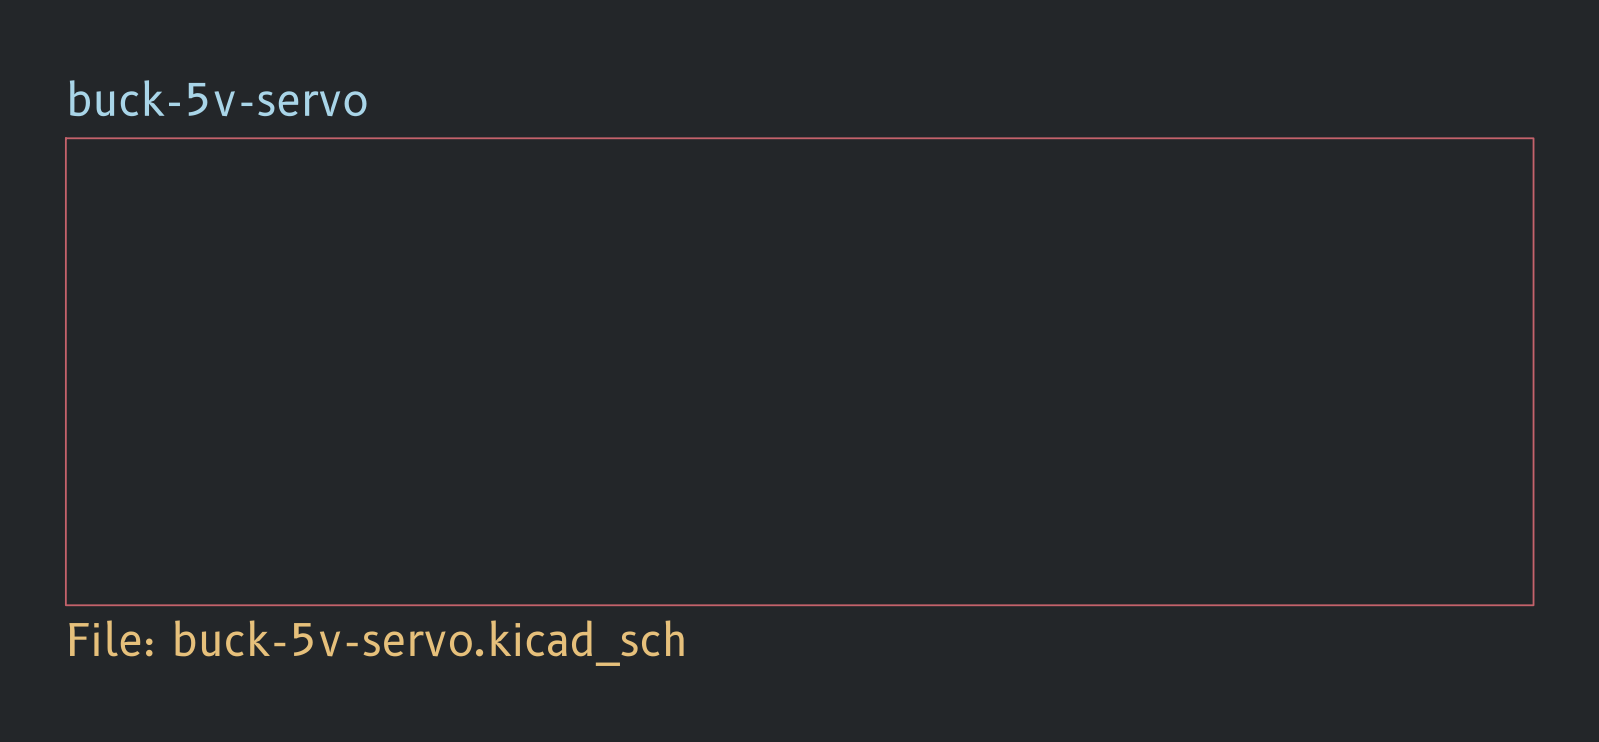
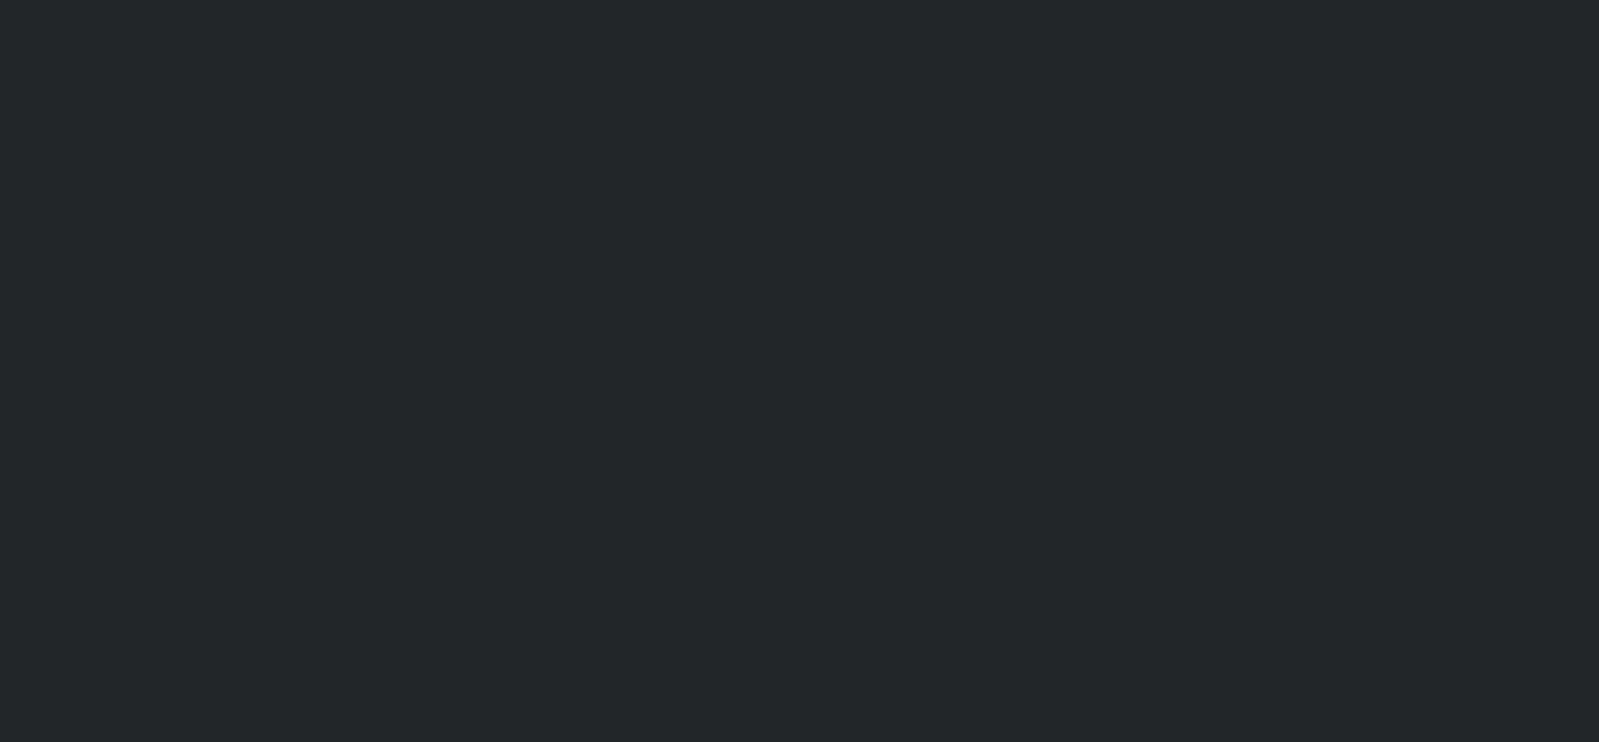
sheet buck-5v-servo: File: buck-5v-servo.kicad_sch (799, 371) -> none

